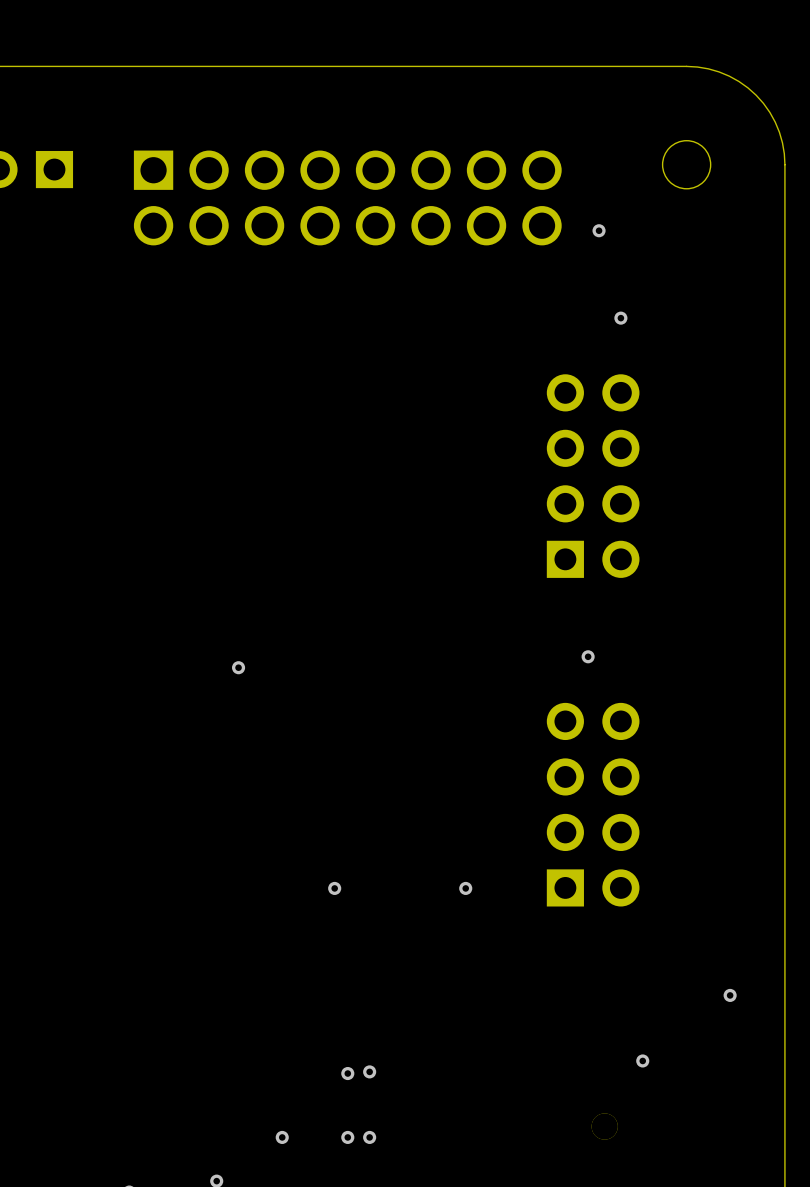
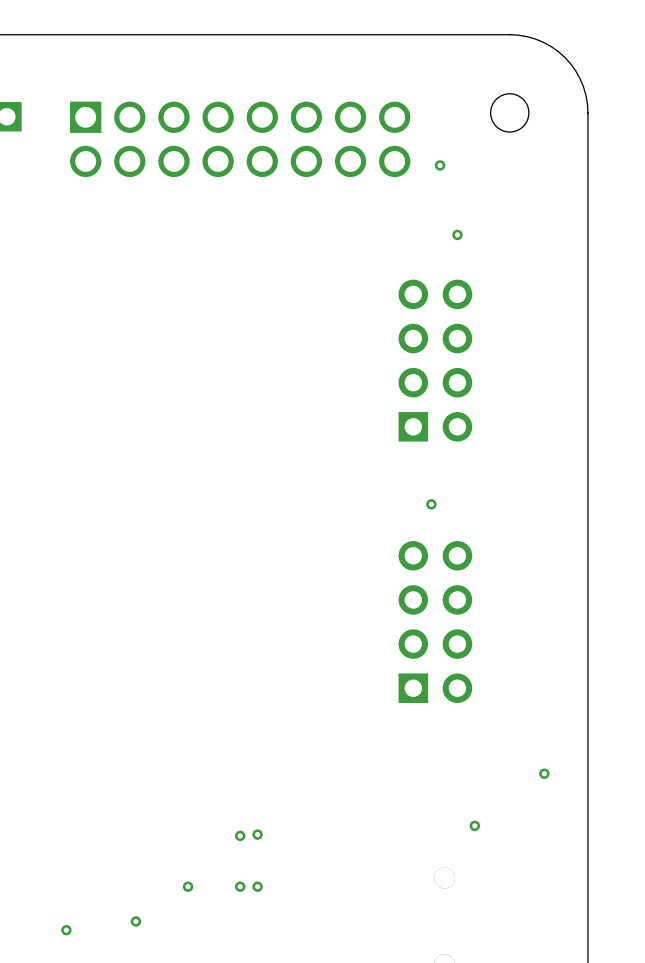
via: (238, 667) -> none
via: (334, 888) -> none
via: (465, 888) -> none

